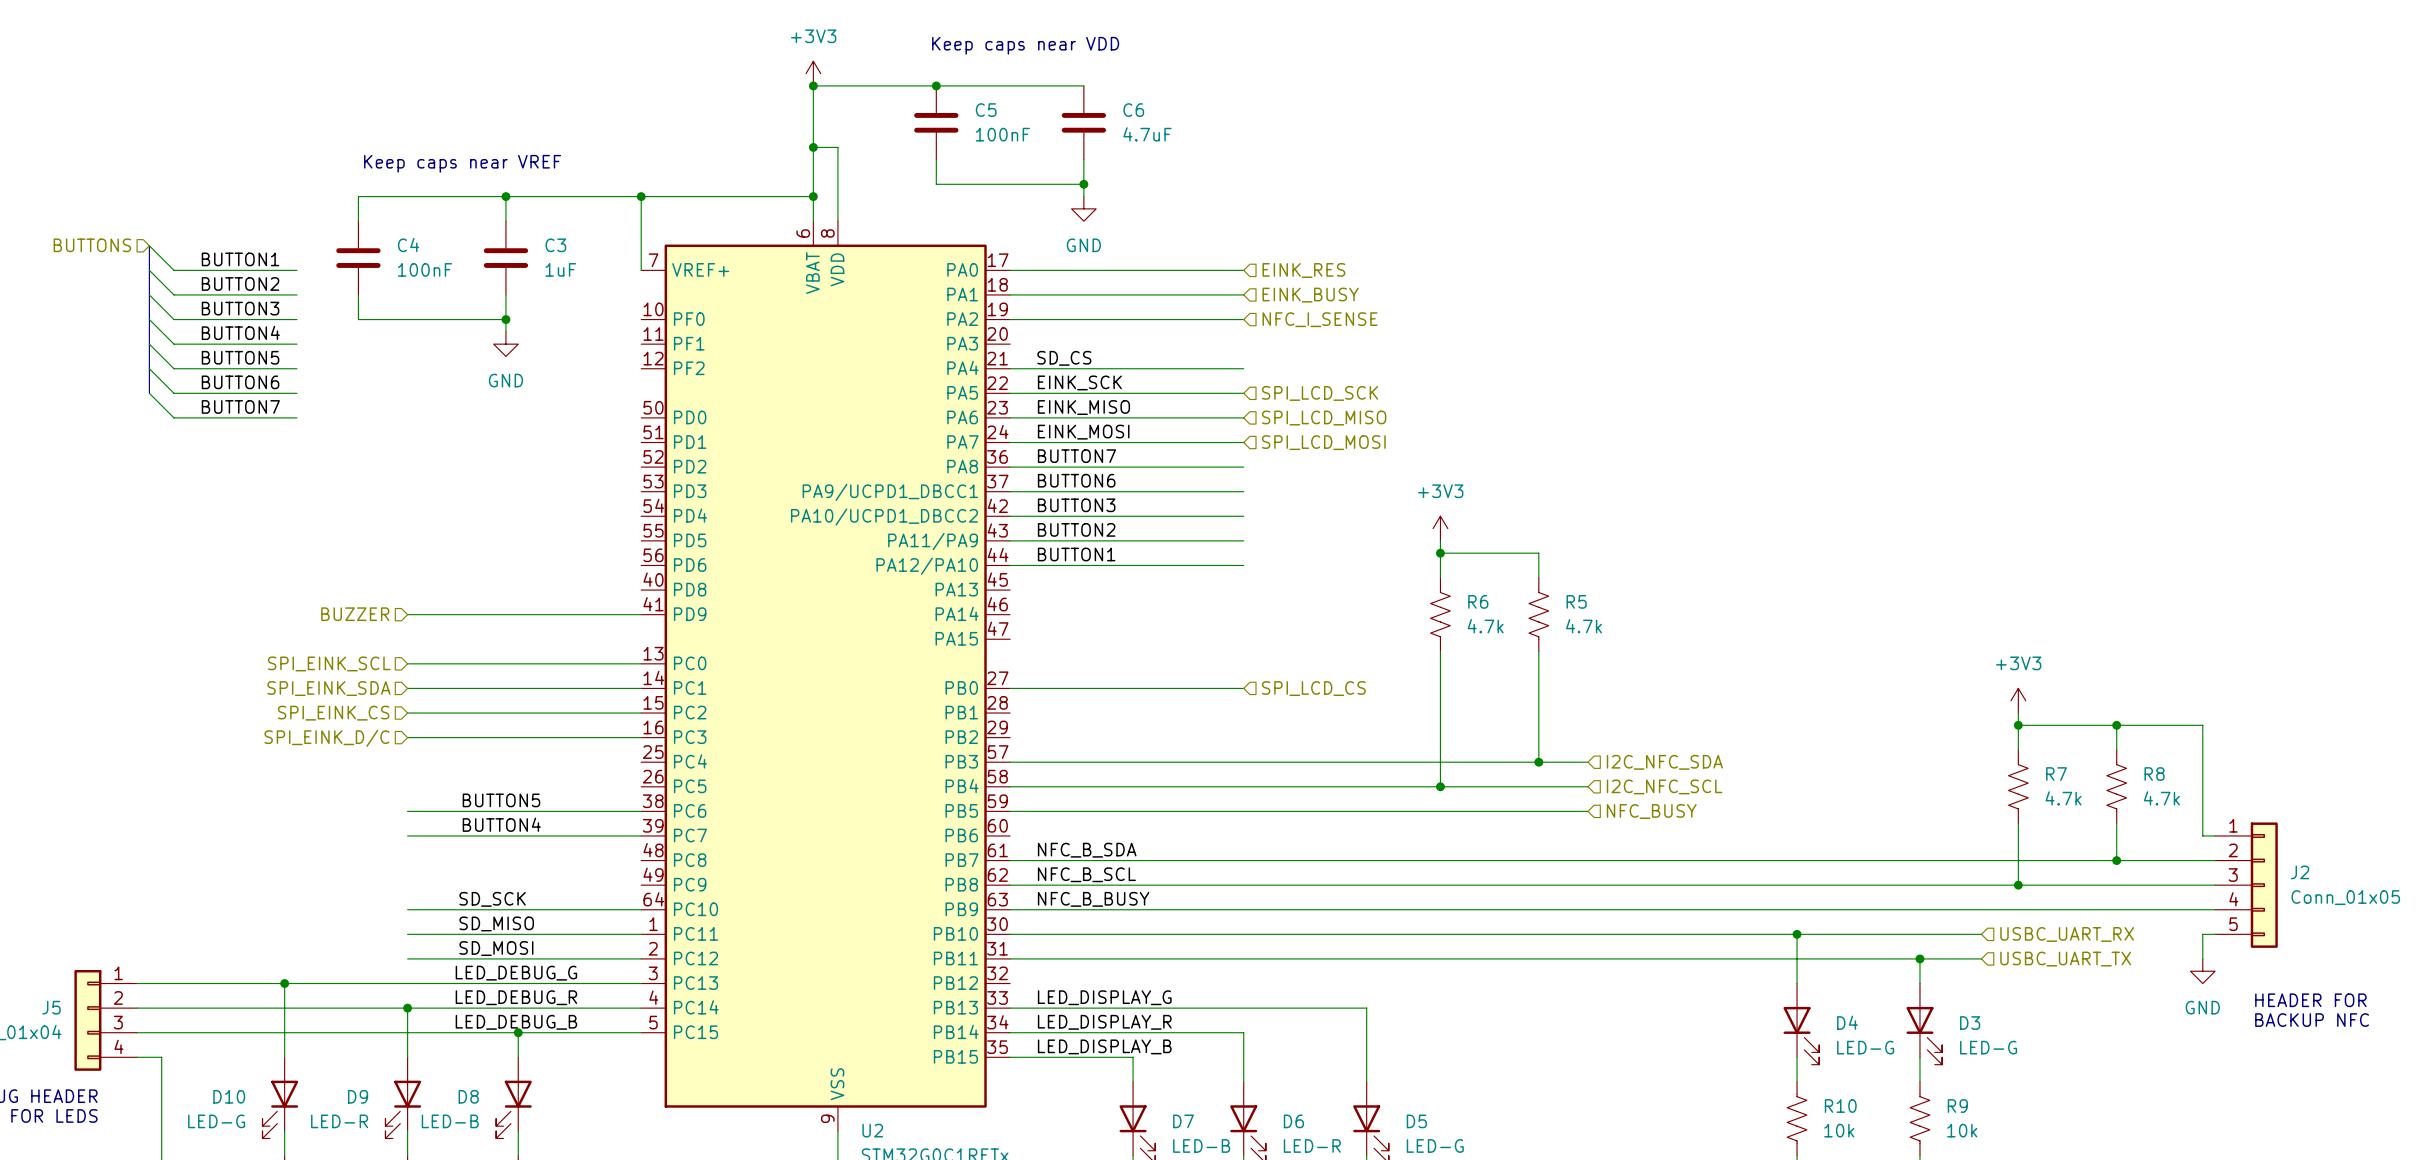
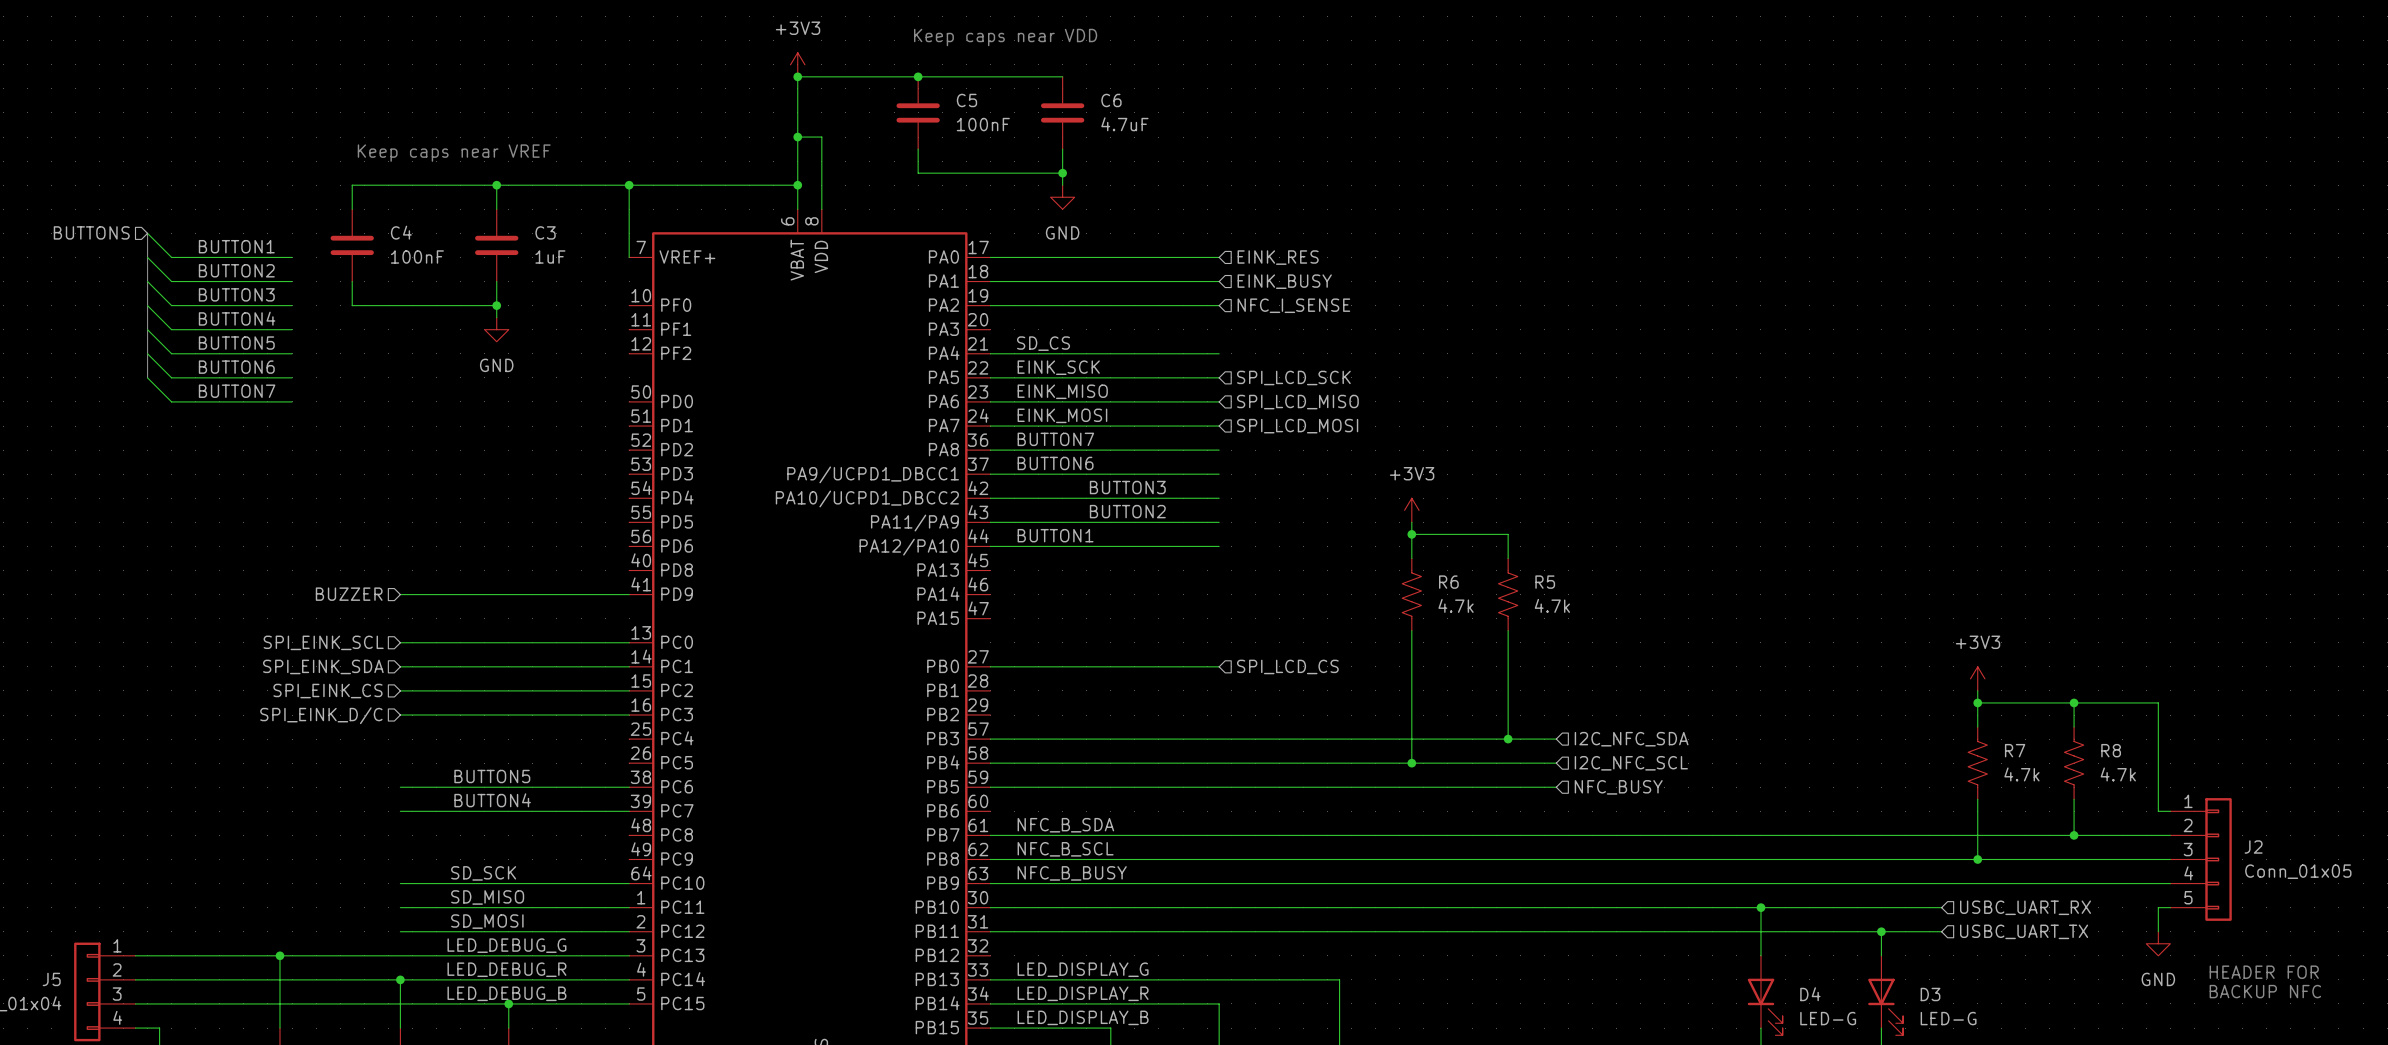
label position: BUTTON3 (1076, 505) -> BUTTON3 (1127, 487)
label position: BUTTON2 (1076, 529) -> BUTTON2 (1127, 511)

